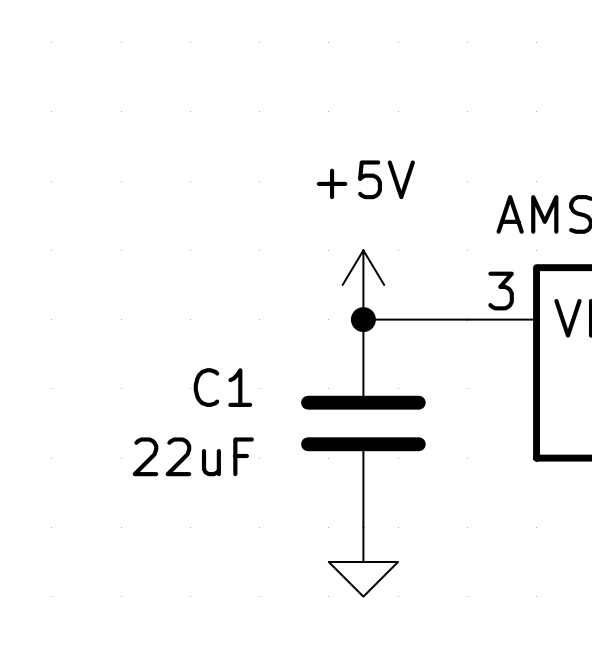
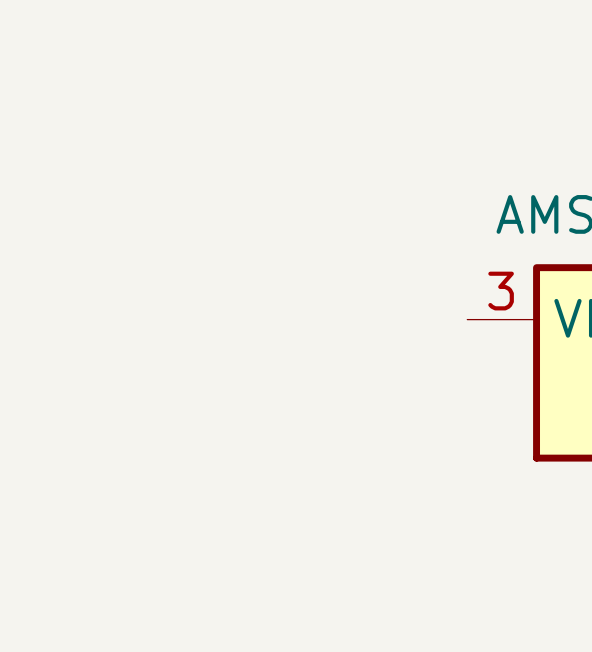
power symbol: +5V (363, 284) -> none
wire: (363, 319) (467, 319) -> none
junction: (363, 319) -> none
C1: 22uF (363, 423) -> none
power symbol: (363, 561) -> none

